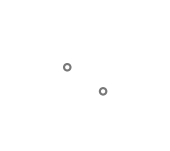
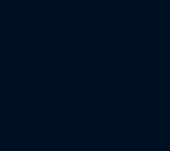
via: (67, 67) -> none
via: (103, 91) -> none

